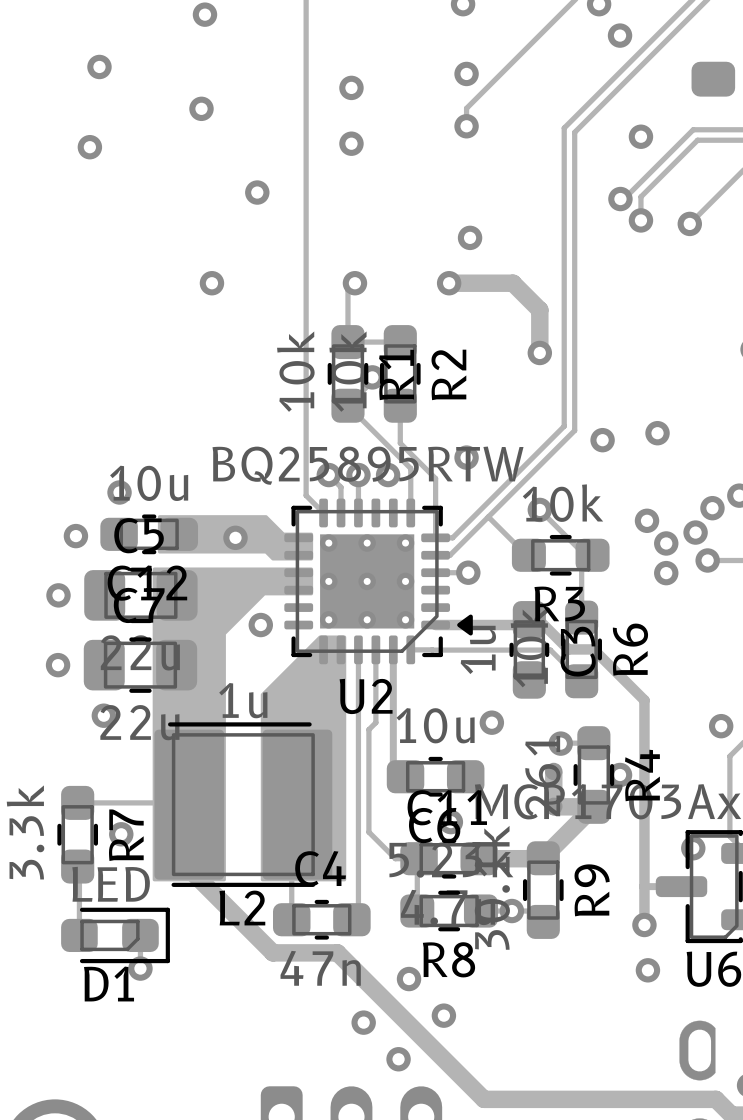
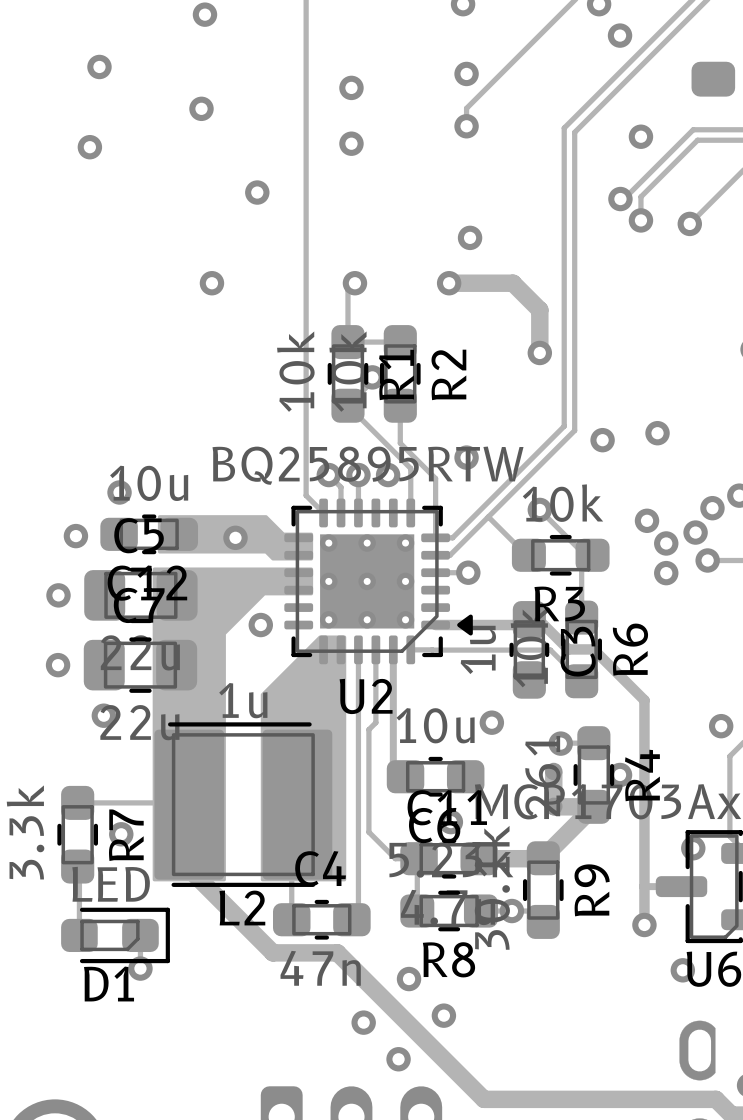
via position: (647, 970) -> (682, 970)

